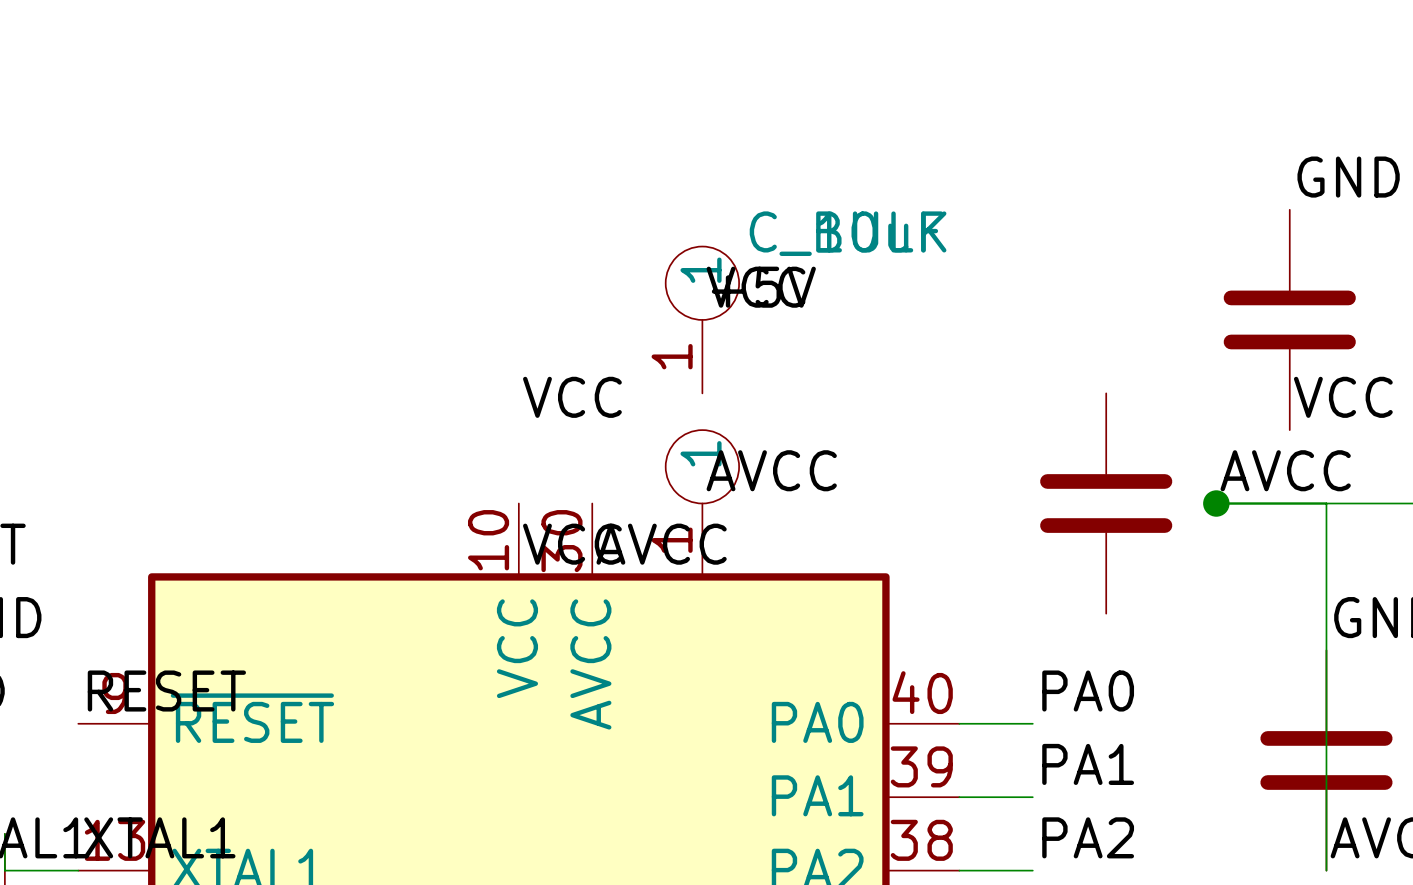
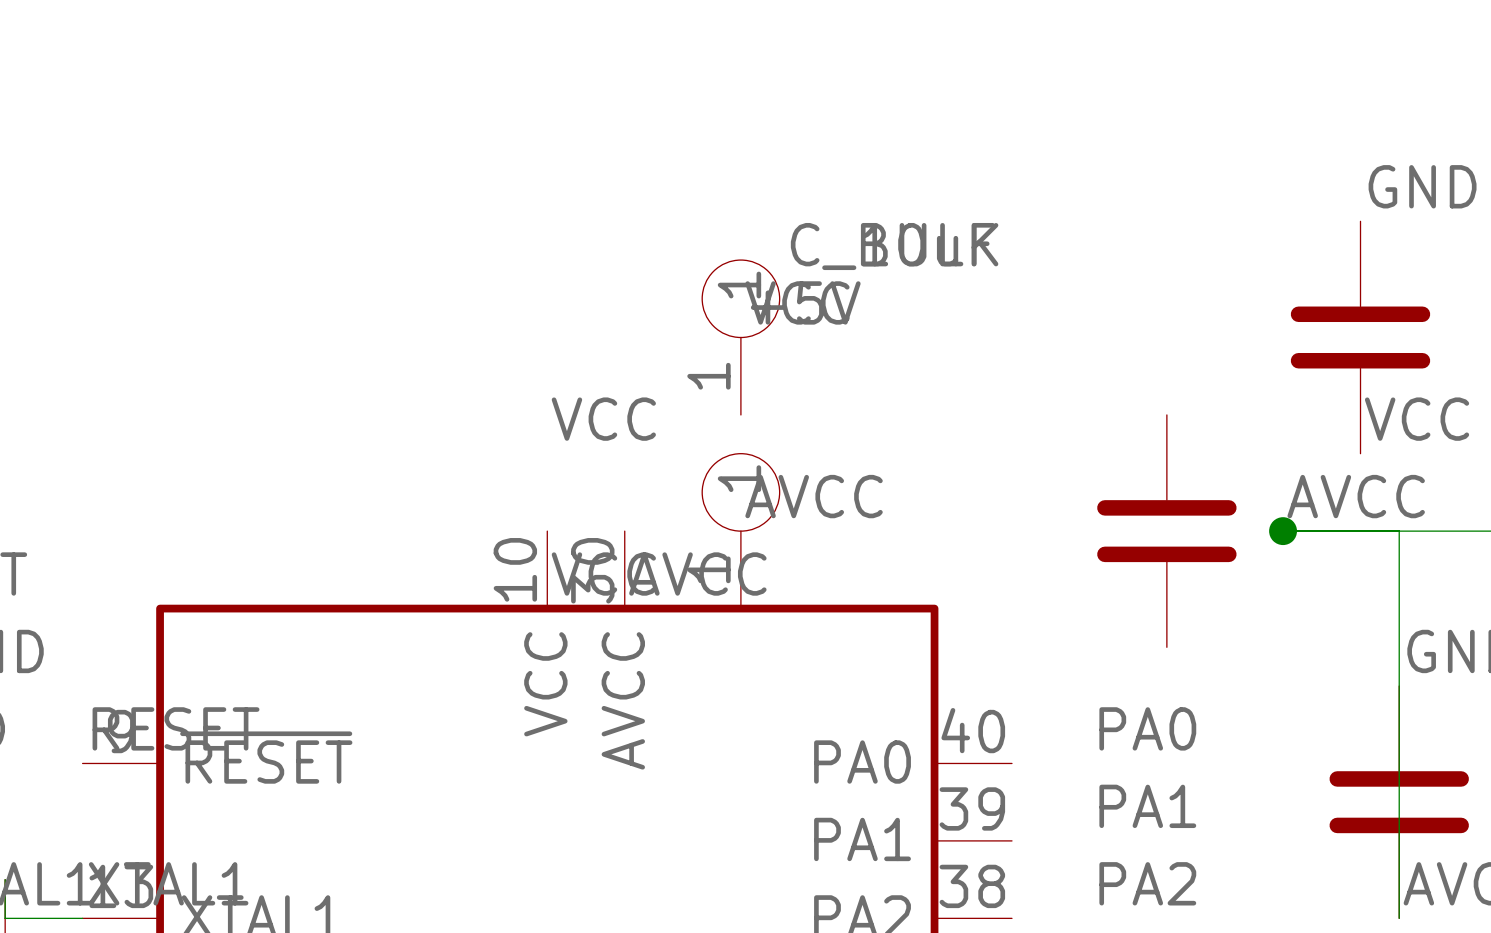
wire: (959, 723) (1032, 723) -> none
wire: (959, 797) (1032, 797) -> none
wire: (959, 870) (1032, 870) -> none

